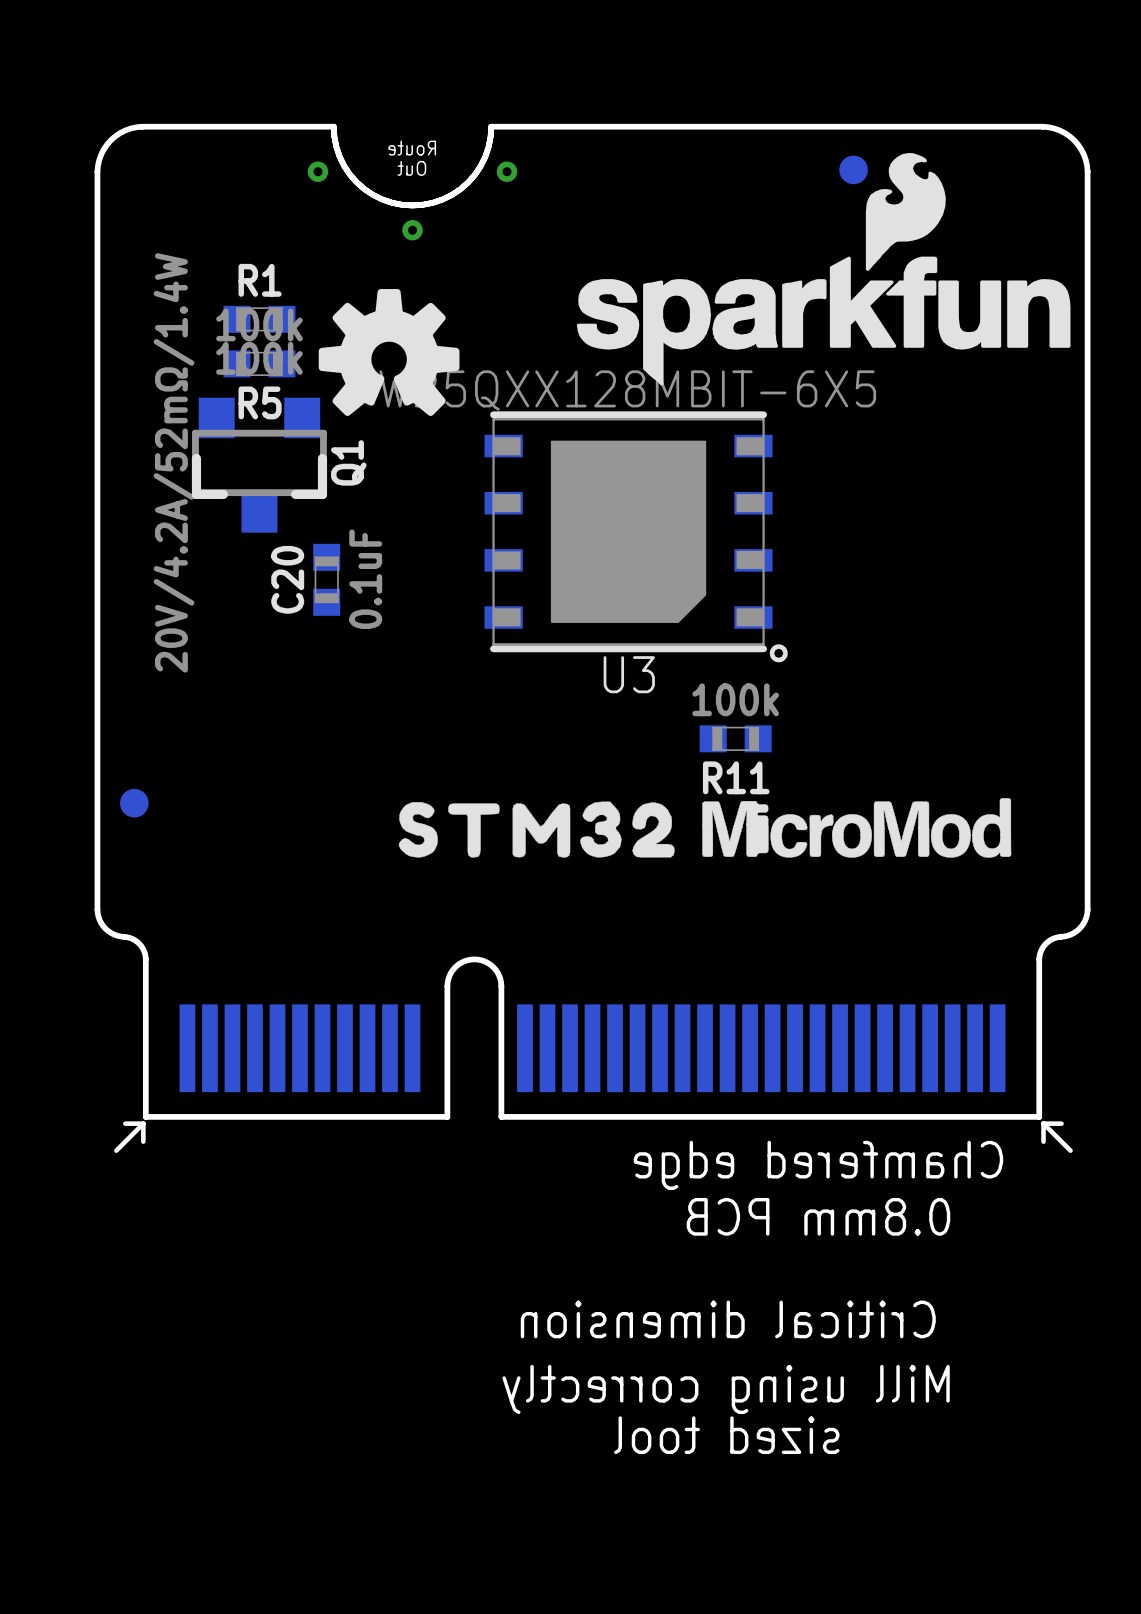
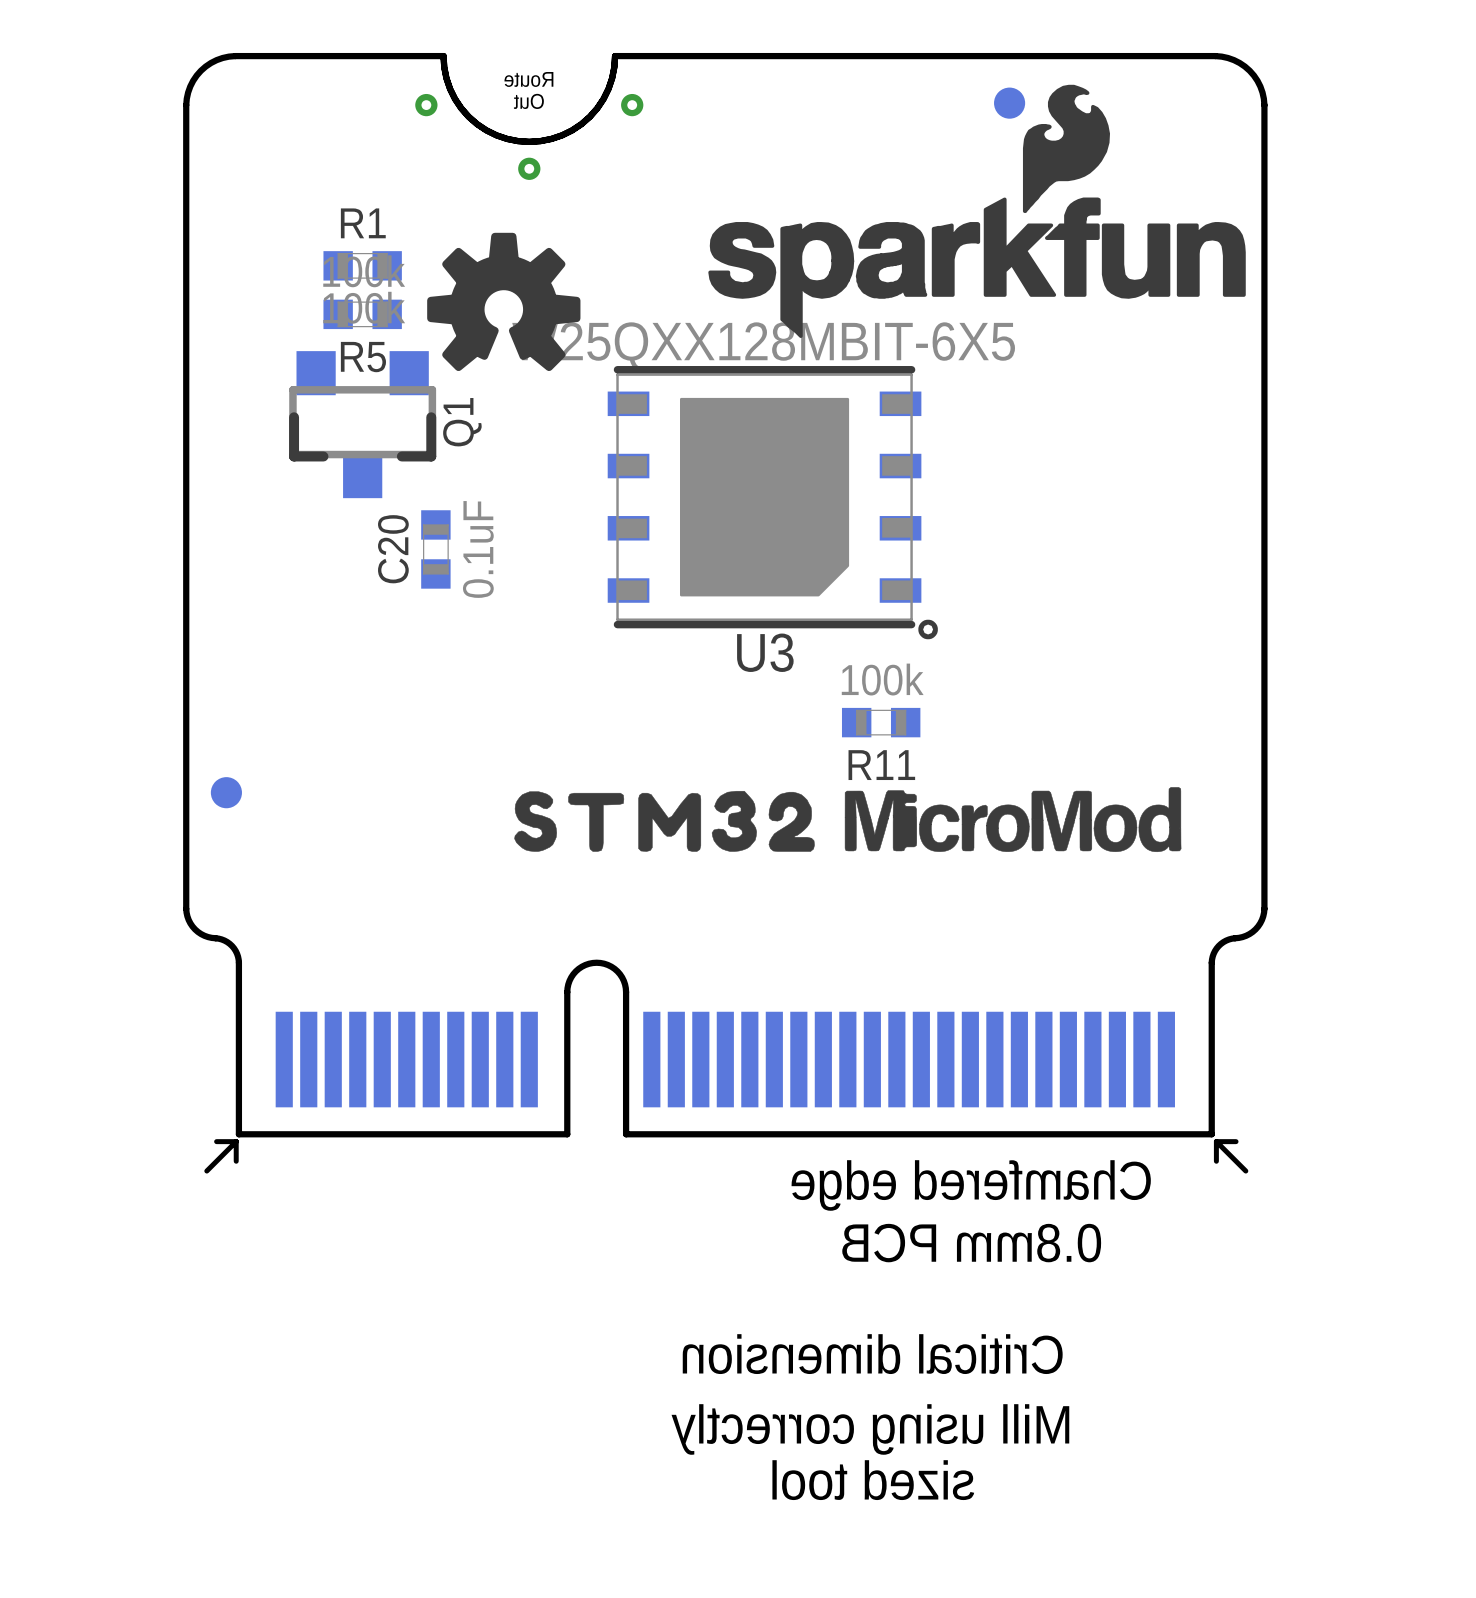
Q1 value: 20V/4.2A/52mΩ/1.4W (174, 462) -> none

